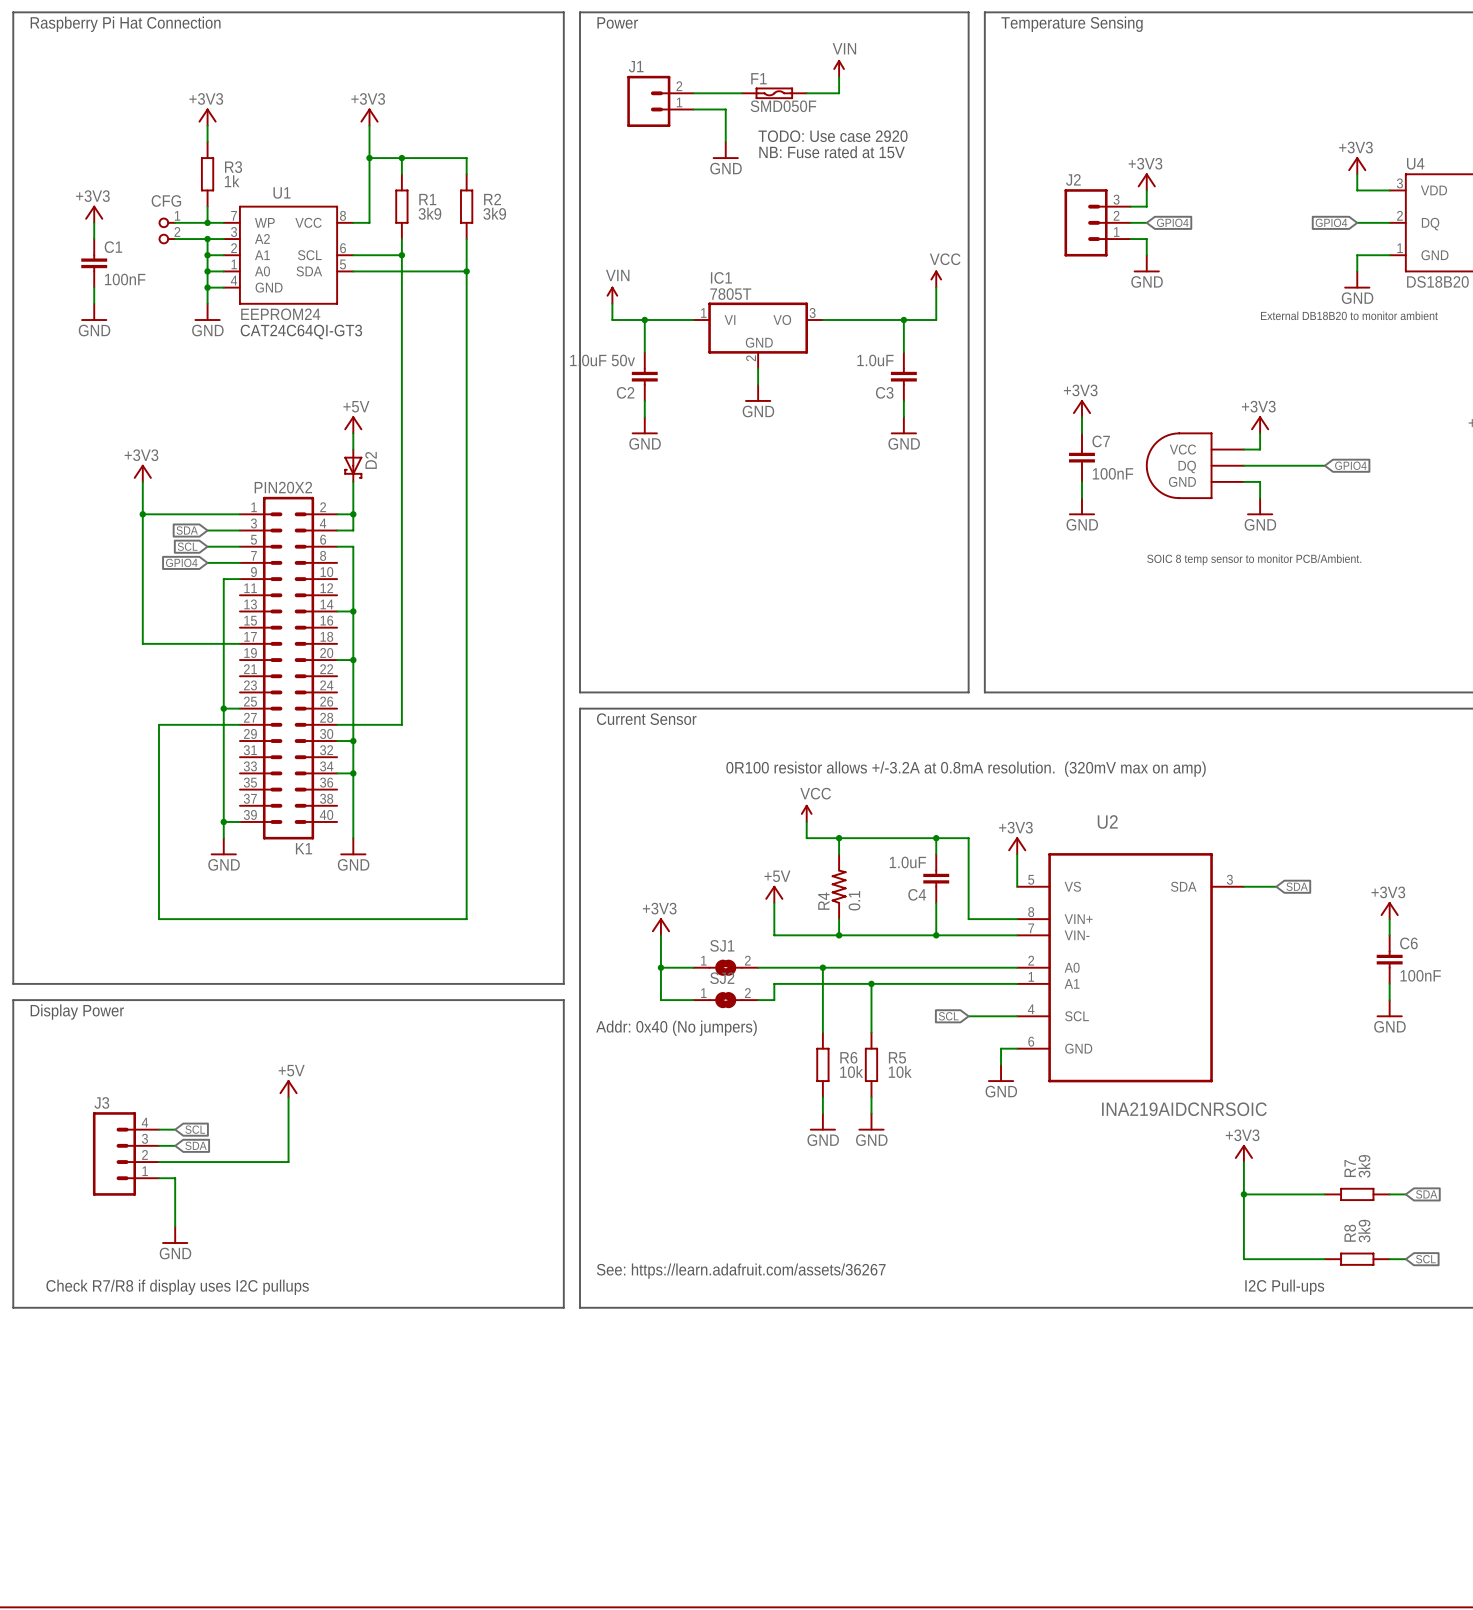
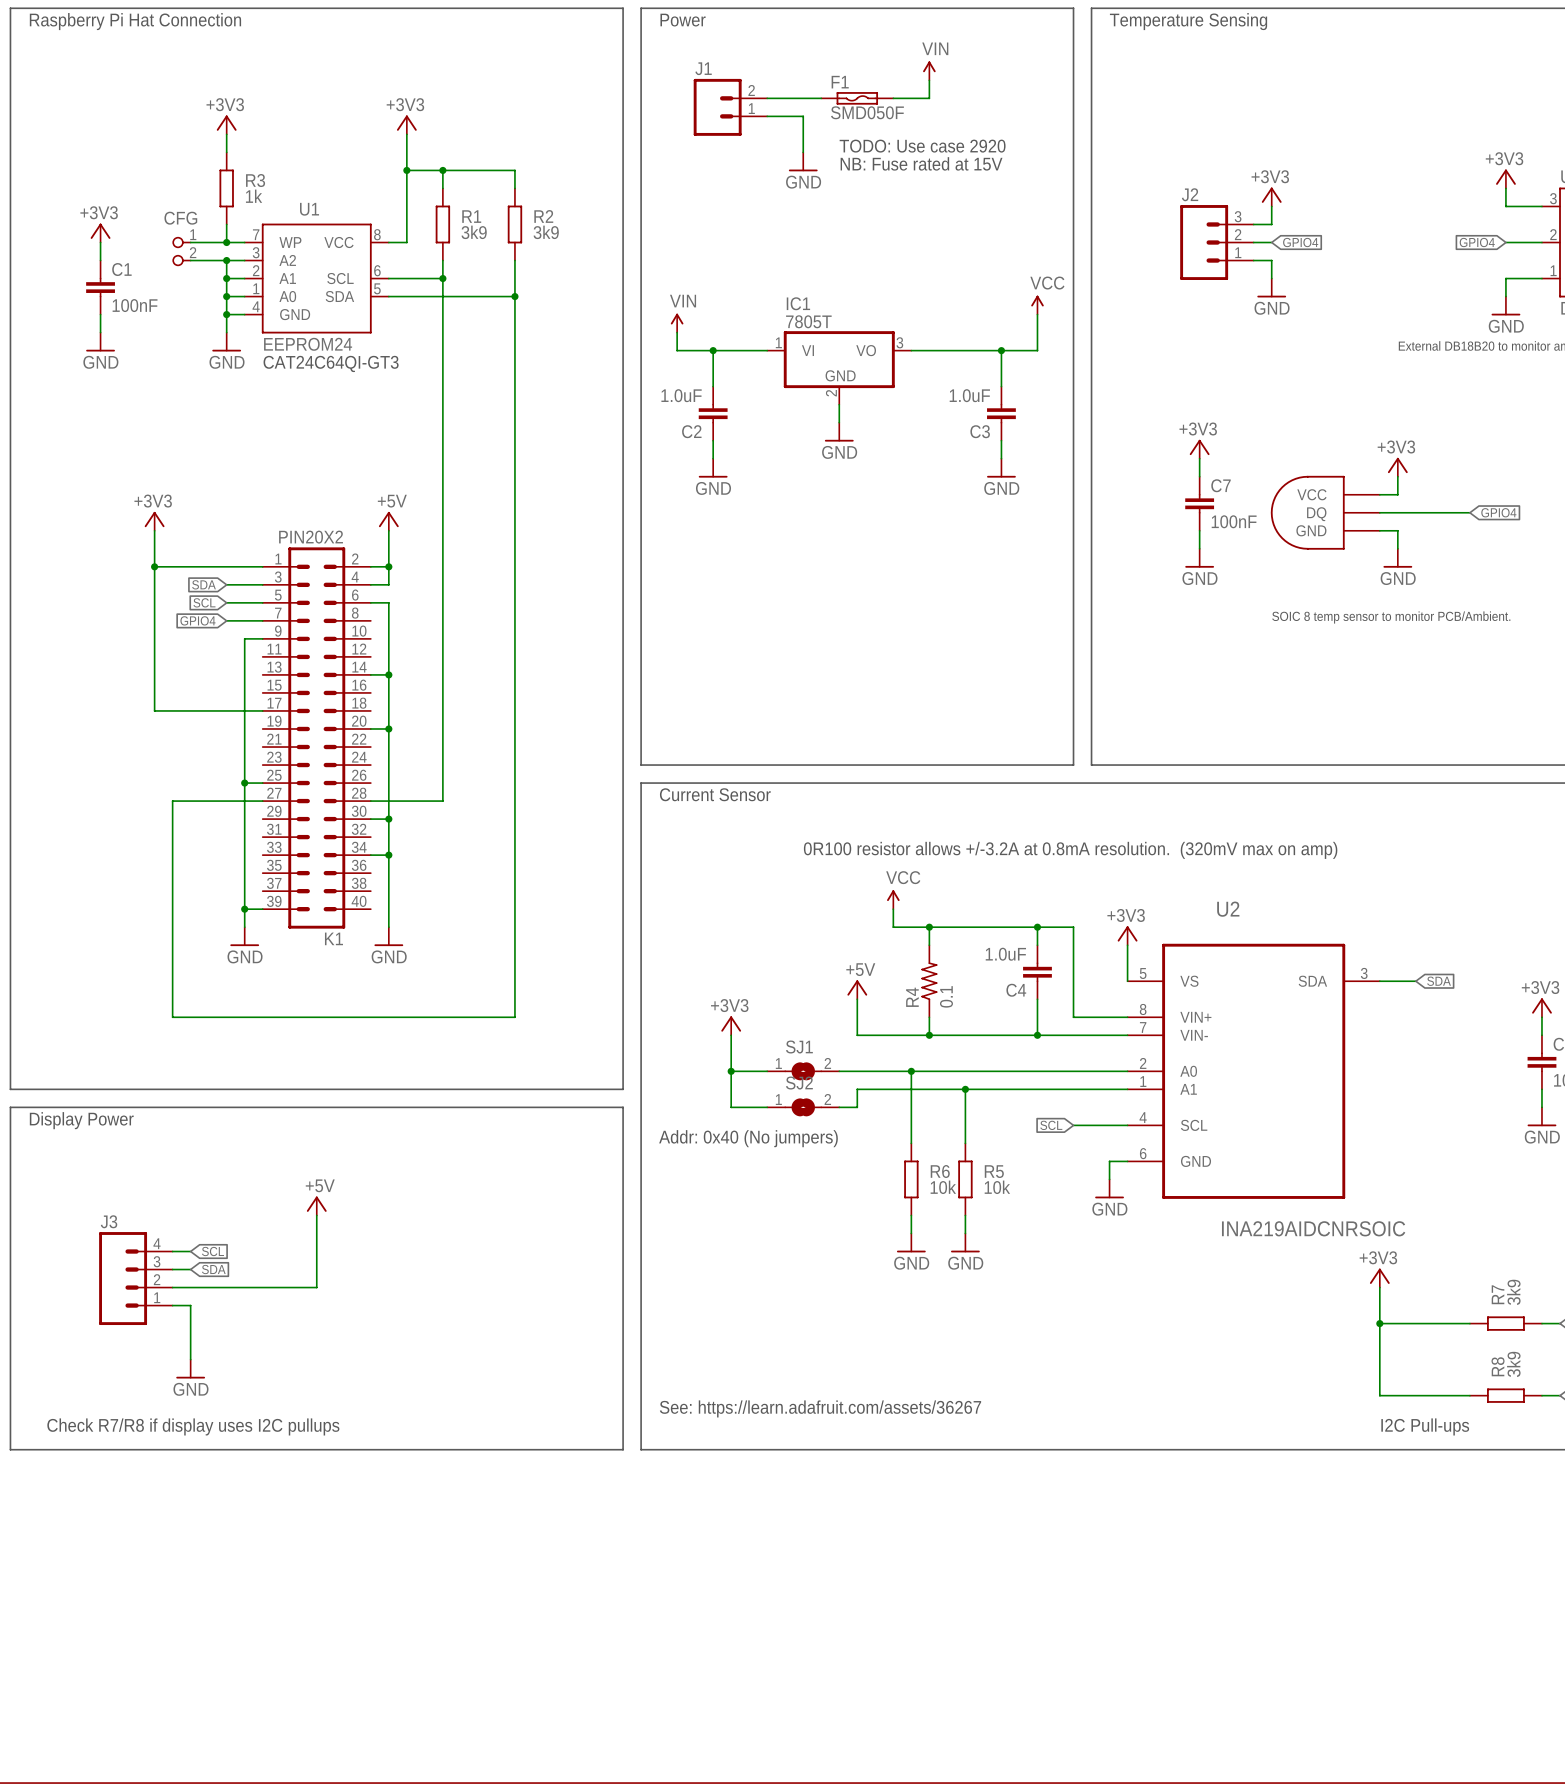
C2 value: 1.0uF 50v (602, 360) -> 1.0uF (681, 395)
power symbol position: +5V (353, 424) -> +5V (388, 521)
wire: (353, 433) (353, 449) -> none
D2: (353, 465) -> none

